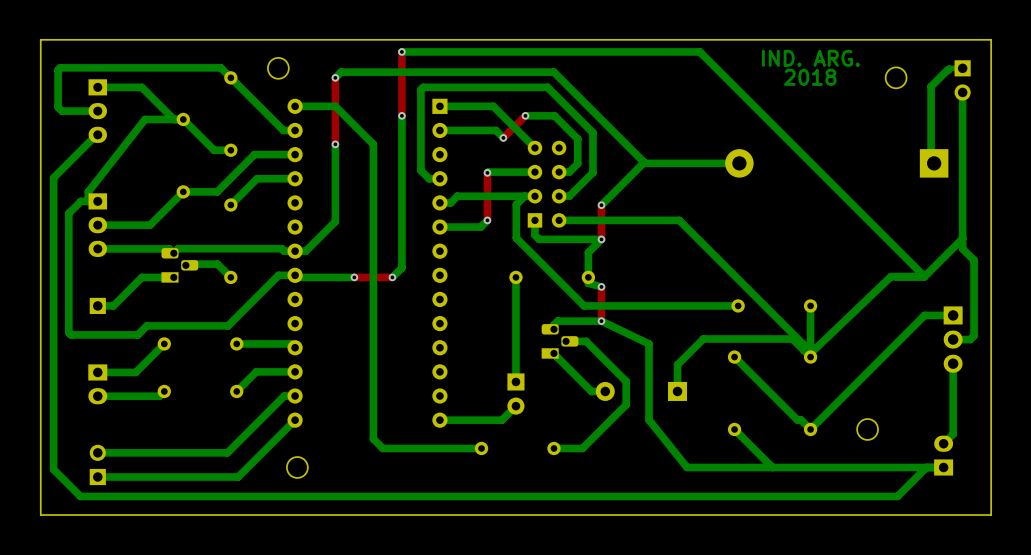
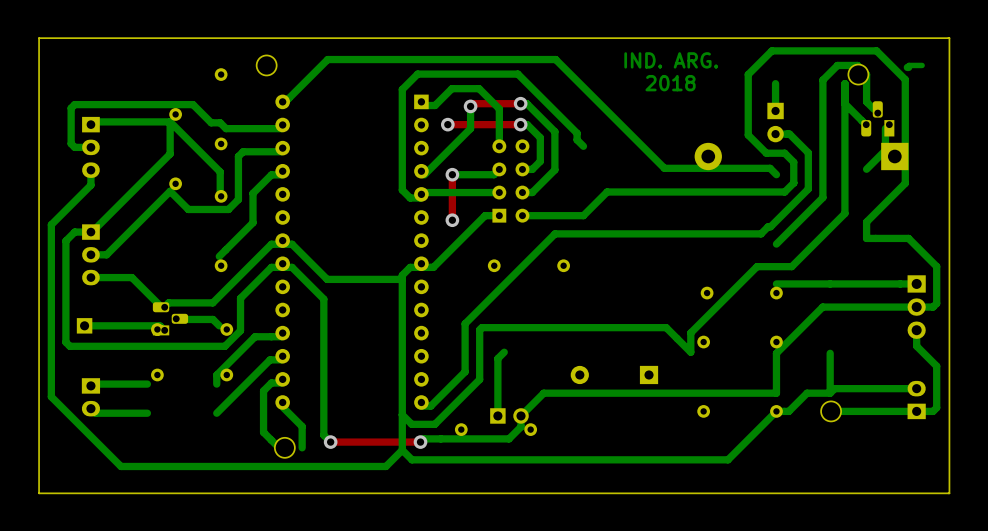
bottom track: (401, 51) (699, 51) (924, 276) -> none
top track: (401, 51) (401, 115) -> none
via: (401, 51) -> none
text position: IND. ARG. (810, 58) -> IND. ARG. (671, 60)
bottom track: (947, 70) (931, 86) (931, 172) -> none
bottom track: (335, 77) (341, 72) (553, 72) (643, 163) -> none
top track: (335, 77) (335, 144) -> none
via: (335, 77) -> none
text position: 2018 (810, 77) -> 2018 (670, 83)
part: (962, 80) -> none
bottom track: (95, 87) (141, 87) (173, 119) -> none
bottom track: none -> (775, 83) (775, 110)
bottom track: none -> (844, 83) (844, 213) (791, 266) (757, 266) (690, 332) (690, 352) (666, 327) (481, 327) (479, 329) (479, 379) (434, 424) (411, 424) (402, 414)
bottom track: (962, 96) (962, 248) (974, 260) (974, 335) (970, 339) (953, 339) -> none
bottom track: (295, 106) (335, 106) (373, 144) (373, 438) (382, 448) (481, 448) -> none
bottom track: (439, 106) (493, 106) (534, 147) -> none
bottom track: none -> (520, 103) (526, 103) (554, 131) (554, 169) (532, 192) (522, 192)
top track: none -> (520, 103) (473, 103) (470, 106)
via: none -> (520, 103)
bottom track: none -> (844, 103) (866, 124)
bottom track: none -> (281, 105) (327, 59) (555, 59) (664, 168) (770, 168) (776, 174)
bottom track: none -> (420, 105) (435, 105) (451, 88) (479, 88) (499, 108) (499, 146)
bottom track: (97, 111) (61, 111) (58, 107) (58, 70) (60, 67) (220, 67) (283, 130) (295, 130) -> none
part: (97, 111) -> none
bottom track: none -> (470, 106) (470, 128) (424, 174)
via: none -> (470, 106)
bottom track: none -> (873, 109) (866, 101) (866, 74) (857, 65) (837, 65) (822, 80) (822, 197) (776, 244)
bottom track: (401, 115) (401, 267) (392, 277) -> none
via: (401, 115) -> none
bottom track: (525, 115) (554, 115) (577, 139) (577, 163) (569, 172) (559, 172) -> none
top track: (525, 115) (503, 137) -> none
via: (525, 115) -> none
part: none -> (877, 118)
bottom track: none -> (170, 121) (93, 121) (90, 124)
bottom track: none -> (170, 121) (220, 171) (220, 192)
part: none -> (775, 122)
bottom track: (439, 130) (495, 130) (503, 137) -> none
via: none -> (447, 124)
bottom track: none -> (520, 124) (527, 124) (540, 137) (540, 161) (532, 169) (522, 169)
top track: none -> (520, 124) (447, 124)
via: none -> (520, 124)
bottom track: (97, 134) (53, 177) (53, 234) -> (90, 170) (90, 185) (51, 224)
bottom track: none -> (281, 128) (226, 128) (220, 122) (211, 122) (193, 104) (74, 104) (71, 108) (71, 143) (74, 147) (90, 147)
bottom track: none -> (885, 128) (885, 150) (866, 169)
via: (503, 137) -> none
bottom track: none -> (775, 134) (789, 134) (808, 152) (808, 189) (770, 226) (761, 233) (555, 233) (465, 323) (465, 371) (430, 406) (420, 406)
bottom track: (335, 144) (335, 221) (305, 251) (284, 251) (281, 248) (177, 248) (173, 253) (169, 248) (97, 248) -> none
via: (335, 144) -> none
bottom track: (230, 150) (214, 150) (183, 119) (145, 119) (88, 191) (88, 201) -> none
bottom track: none -> (583, 146) (577, 139) (577, 133) (517, 74) (417, 74) (402, 89) (402, 190) (410, 198) (420, 198) (425, 192) (499, 192)
part: none -> (90, 147)
bottom track: (294, 153) (254, 154) (217, 191) (183, 191) (150, 225) (97, 225) -> none
bottom track: none -> (281, 151) (243, 151) (238, 156) (238, 199) (228, 209) (188, 209) (170, 191) (106, 254) (90, 254)
bottom track: (643, 163) (601, 205) -> none
bottom track: (739, 163) (643, 163) -> none
top track: (487, 172) (487, 220) -> (452, 174) (452, 220)
via: (487, 172) -> none
bottom track: (534, 172) (487, 172) -> none
bottom track: none -> (499, 169) (494, 174) (452, 174)
bottom track: (295, 178) (257, 178) (230, 205) -> none
bottom track: (439, 178) (429, 178) (420, 170) (420, 89) (423, 87) (547, 87) (592, 132) (592, 172) (569, 196) (559, 196) -> none
bottom track: none -> (281, 174) (271, 174) (253, 193) (253, 222) (219, 256)
via: none -> (452, 174)
part position: (547, 184) -> (510, 180)
bottom track: (524, 196) (516, 204) (516, 238) (584, 305) (738, 305) -> none
bottom track: (534, 196) (457, 196) (450, 202) (439, 202) -> none
bottom track: (97, 201) (80, 201) (68, 213) (68, 251) -> (170, 121) (170, 153) (92, 232) (74, 232) (65, 240)
top track: (601, 205) (601, 239) -> none
via: (601, 205) -> none
bottom track: (487, 220) (480, 227) (439, 227) -> none
via: (487, 220) -> none
bottom track: (534, 220) (534, 235) (539, 239) (601, 239) (588, 252) (588, 283) (601, 286) -> none
bottom track: (559, 220) (679, 220) (803, 344) (803, 350) -> none
part: (97, 225) -> none
bottom track: none -> (499, 215) (485, 215) (433, 267) (410, 267) (402, 275) (402, 450)
bottom track: none -> (522, 215) (583, 215) (607, 192) (784, 192) (793, 183) (793, 162) (784, 153) (766, 153) (748, 135) (748, 74) (771, 50) (876, 50) (905, 79) (905, 183) (866, 222) (866, 238) (908, 238) (936, 266) (936, 303) (933, 307) (822, 307) (776, 353) (776, 393) (543, 393) (521, 415) (521, 426) (509, 438) (423, 438) (420, 442)
via: none -> (452, 220)
bottom track: (962, 238) (924, 276) -> none
via: (601, 239) -> none
bottom track: (189, 264) (217, 264) (230, 277) -> none
part position: (179, 265) -> (170, 318)
part: none -> (90, 254)
bottom track: (924, 276) (890, 276) (810, 353) (810, 305) -> none
bottom track: (173, 277) (141, 277) (113, 305) (97, 305) -> none
bottom track: (354, 277) (297, 277) (295, 275) (278, 275) (228, 325) (146, 325) (137, 334) (71, 334) (68, 332) -> (330, 442) (323, 435) (323, 299) (292, 267) (271, 267) (240, 298) (240, 330) (224, 346) (69, 346) (65, 342) (65, 318)
via: (354, 277) -> none
top track: (392, 277) (354, 277) -> none
via: (392, 277) -> none
bottom track: (515, 277) (515, 381) -> none
top track: (601, 286) (601, 321) -> none
via: (601, 286) -> none
bottom track: none -> (90, 277) (131, 277) (161, 307) (168, 302) (212, 302) (271, 244) (292, 244) (327, 279) (402, 279)
bottom track: none -> (916, 283) (776, 283)
part position: (97, 305) -> (84, 325)
bottom track: (953, 315) (924, 315) (810, 429) (801, 419) (797, 419) (734, 357) -> none
via: (601, 321) -> none
bottom track: (553, 329) (553, 324) (557, 321) (601, 321) (649, 343) (649, 419) (687, 467) (943, 467) -> none
bottom track: none -> (180, 319) (212, 319) (219, 325)
part position: (953, 339) -> (916, 307)
bottom track: none -> (84, 325) (159, 325) (164, 330)
part: (560, 341) -> none
bottom track: (570, 341) (586, 341) (626, 381) (626, 404) (582, 448) (553, 448) -> none
bottom track: (164, 343) (135, 372) (97, 372) -> none
bottom track: (236, 343) (291, 343) (295, 347) -> none
bottom track: none -> (916, 330) (916, 346) (936, 366) (936, 407) (933, 411) (916, 411)
bottom track: none -> (281, 336) (255, 336) (216, 375) (216, 384)
bottom track: (553, 353) (591, 391) (605, 391) -> none
bottom track: (810, 357) (792, 339) (703, 339) (677, 364) (677, 381) -> none
bottom track: (953, 363) (953, 434) (943, 443) -> none
bottom track: none -> (504, 352) (497, 358) (497, 415)
bottom track: none -> (830, 353) (830, 393)
bottom track: (295, 371) (256, 371) (236, 391) -> none
bottom track: none -> (281, 359) (270, 359) (216, 413)
part position: (97, 384) -> (90, 397)
bottom track: (164, 391) (159, 396) (97, 396) -> none
part: (515, 394) -> none
bottom track: (295, 396) (284, 396) (227, 452) (99, 452) -> none
bottom track: none -> (281, 383) (271, 383) (263, 390) (263, 432) (279, 447)
bottom track: none -> (147, 384) (92, 384) (90, 385)
bottom track: none -> (913, 388) (834, 388) (830, 393)
bottom track: (515, 406) (501, 420) (439, 420) -> none
bottom track: none -> (830, 393) (807, 393) (788, 411) (776, 411) (728, 459) (411, 459) (402, 450)
bottom track: (53, 414) (53, 469) (80, 496) (897, 496) (926, 467) -> (51, 396) (121, 466) (385, 466) (402, 450)
bottom track: (295, 420) (238, 476) (97, 476) -> none
bottom track: none -> (281, 406) (302, 426) (302, 447)
bottom track: none -> (90, 408) (95, 413) (147, 413)
bottom track: (734, 429) (772, 467) -> none
bottom track: none -> (913, 411) (830, 411)
part: none -> (509, 415)
part position: (943, 455) -> (916, 400)
via: none -> (330, 442)
top track: none -> (420, 442) (330, 442)
via: none -> (420, 442)
part: (97, 464) -> none

